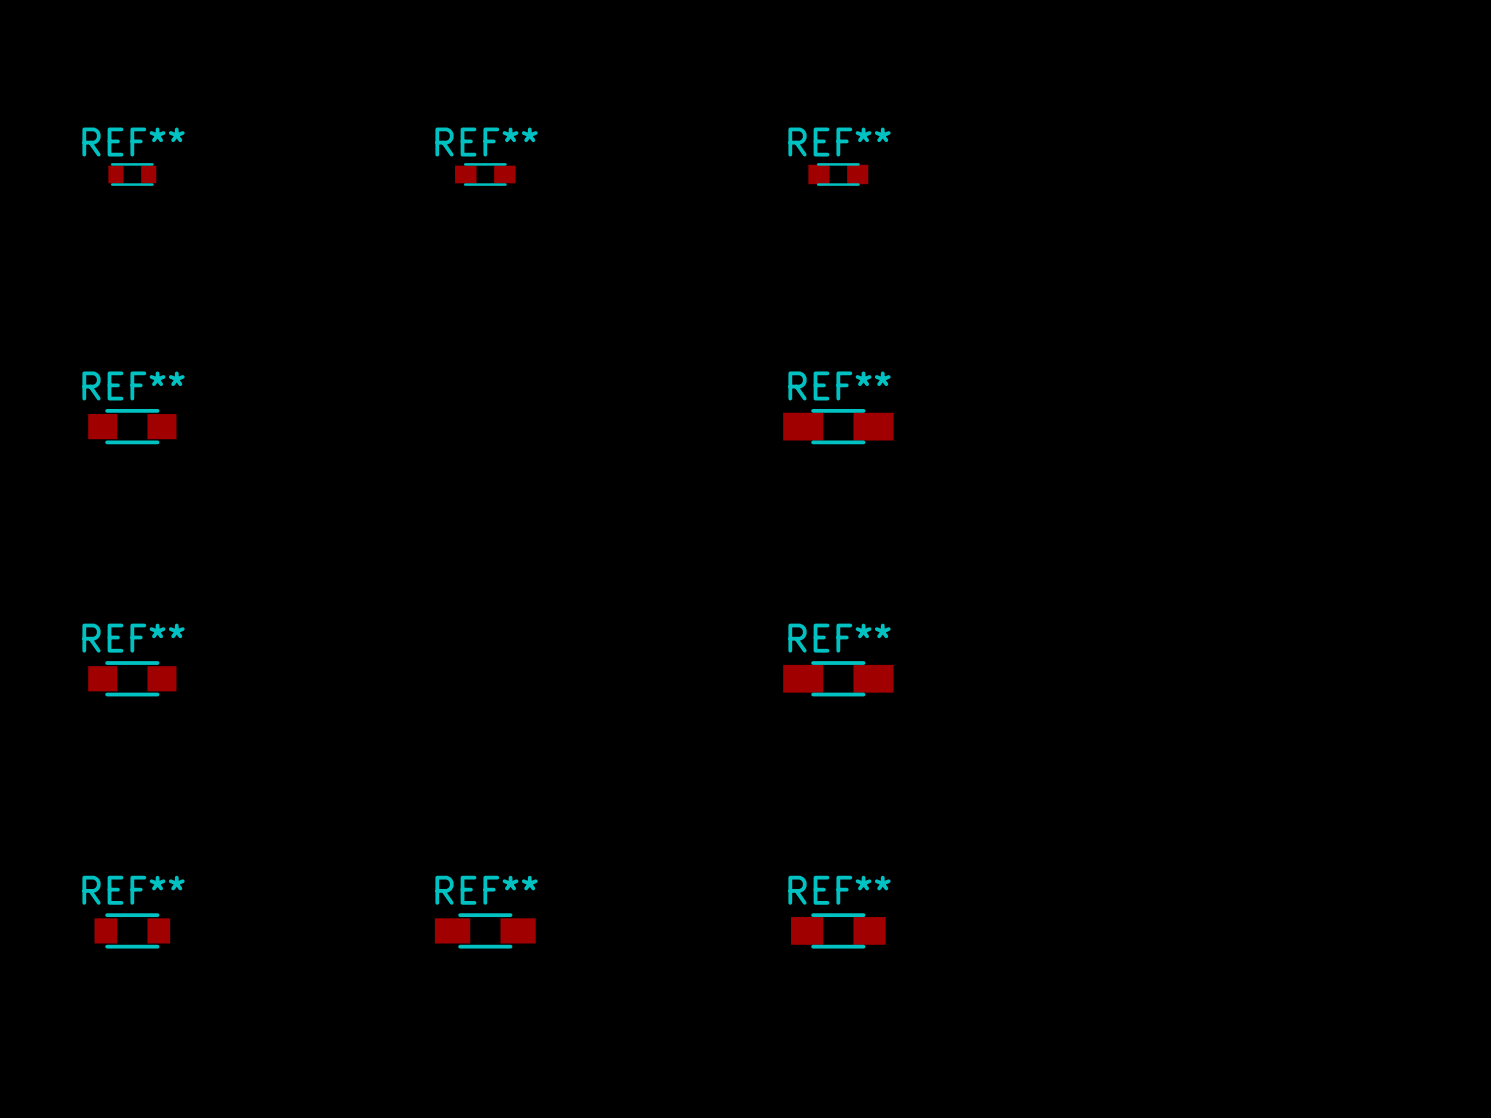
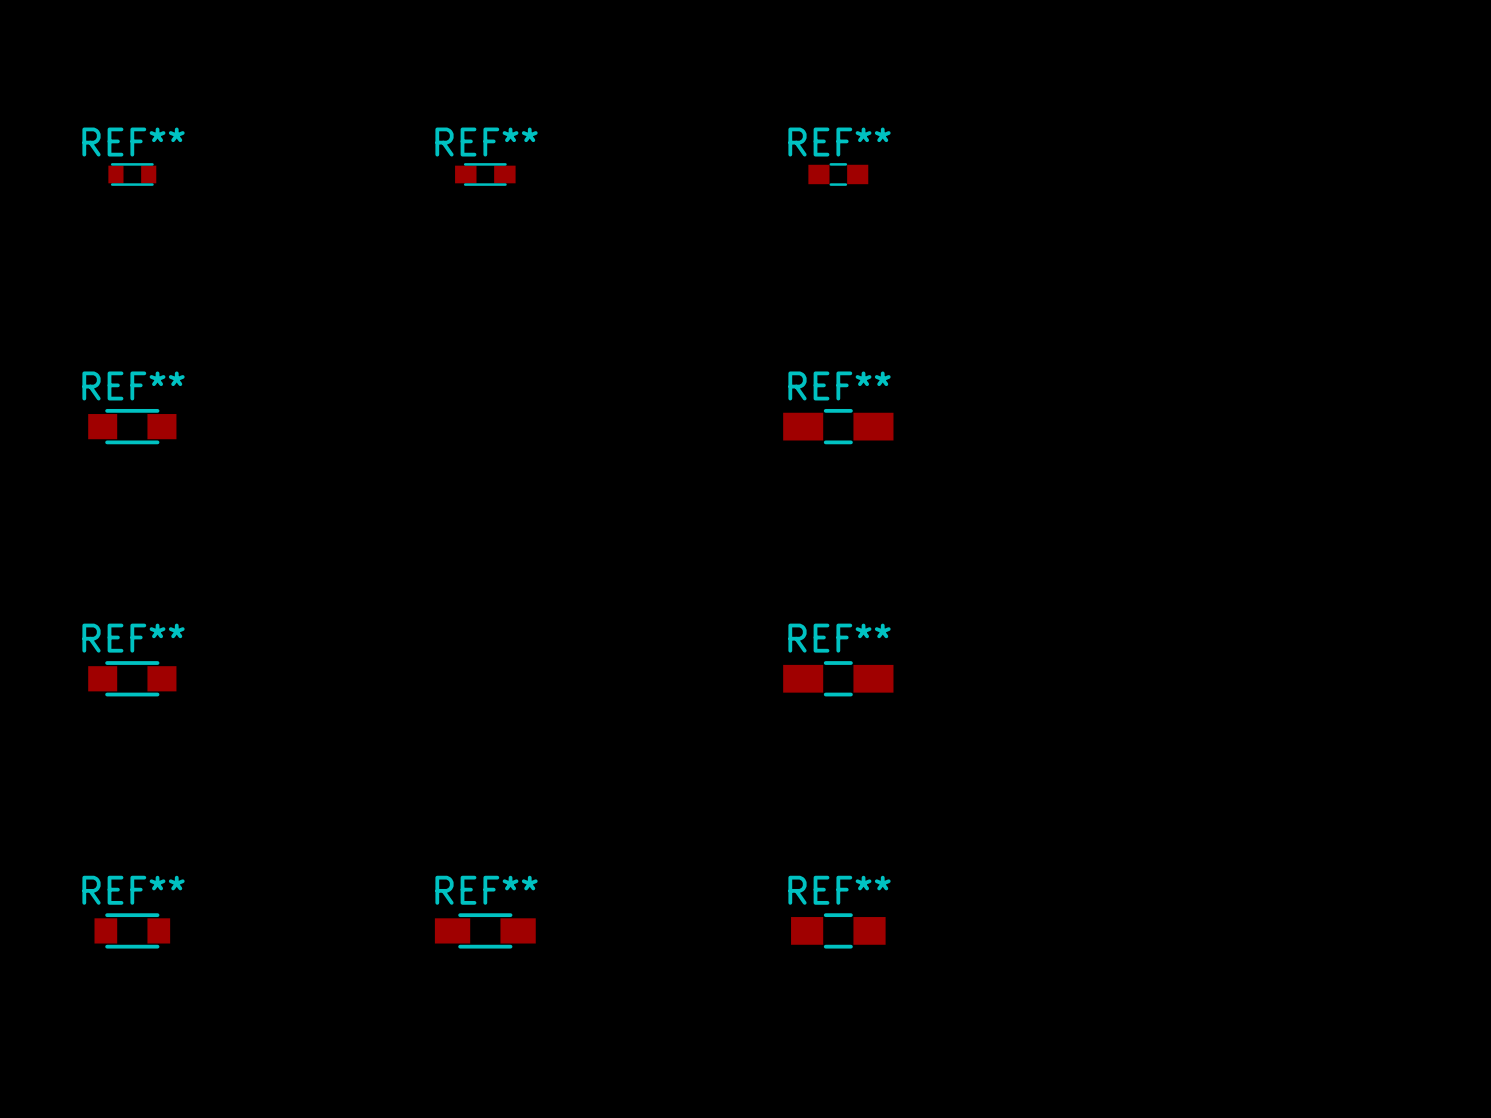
REF** footprint: [808, 163, 869, 186] -> [808, 163, 869, 186]
REF** footprint: [783, 408, 894, 445] -> [783, 408, 894, 445]
REF** footprint: [783, 661, 894, 697] -> [783, 661, 894, 697]
REF** footprint: [791, 913, 886, 949] -> [791, 913, 886, 949]

